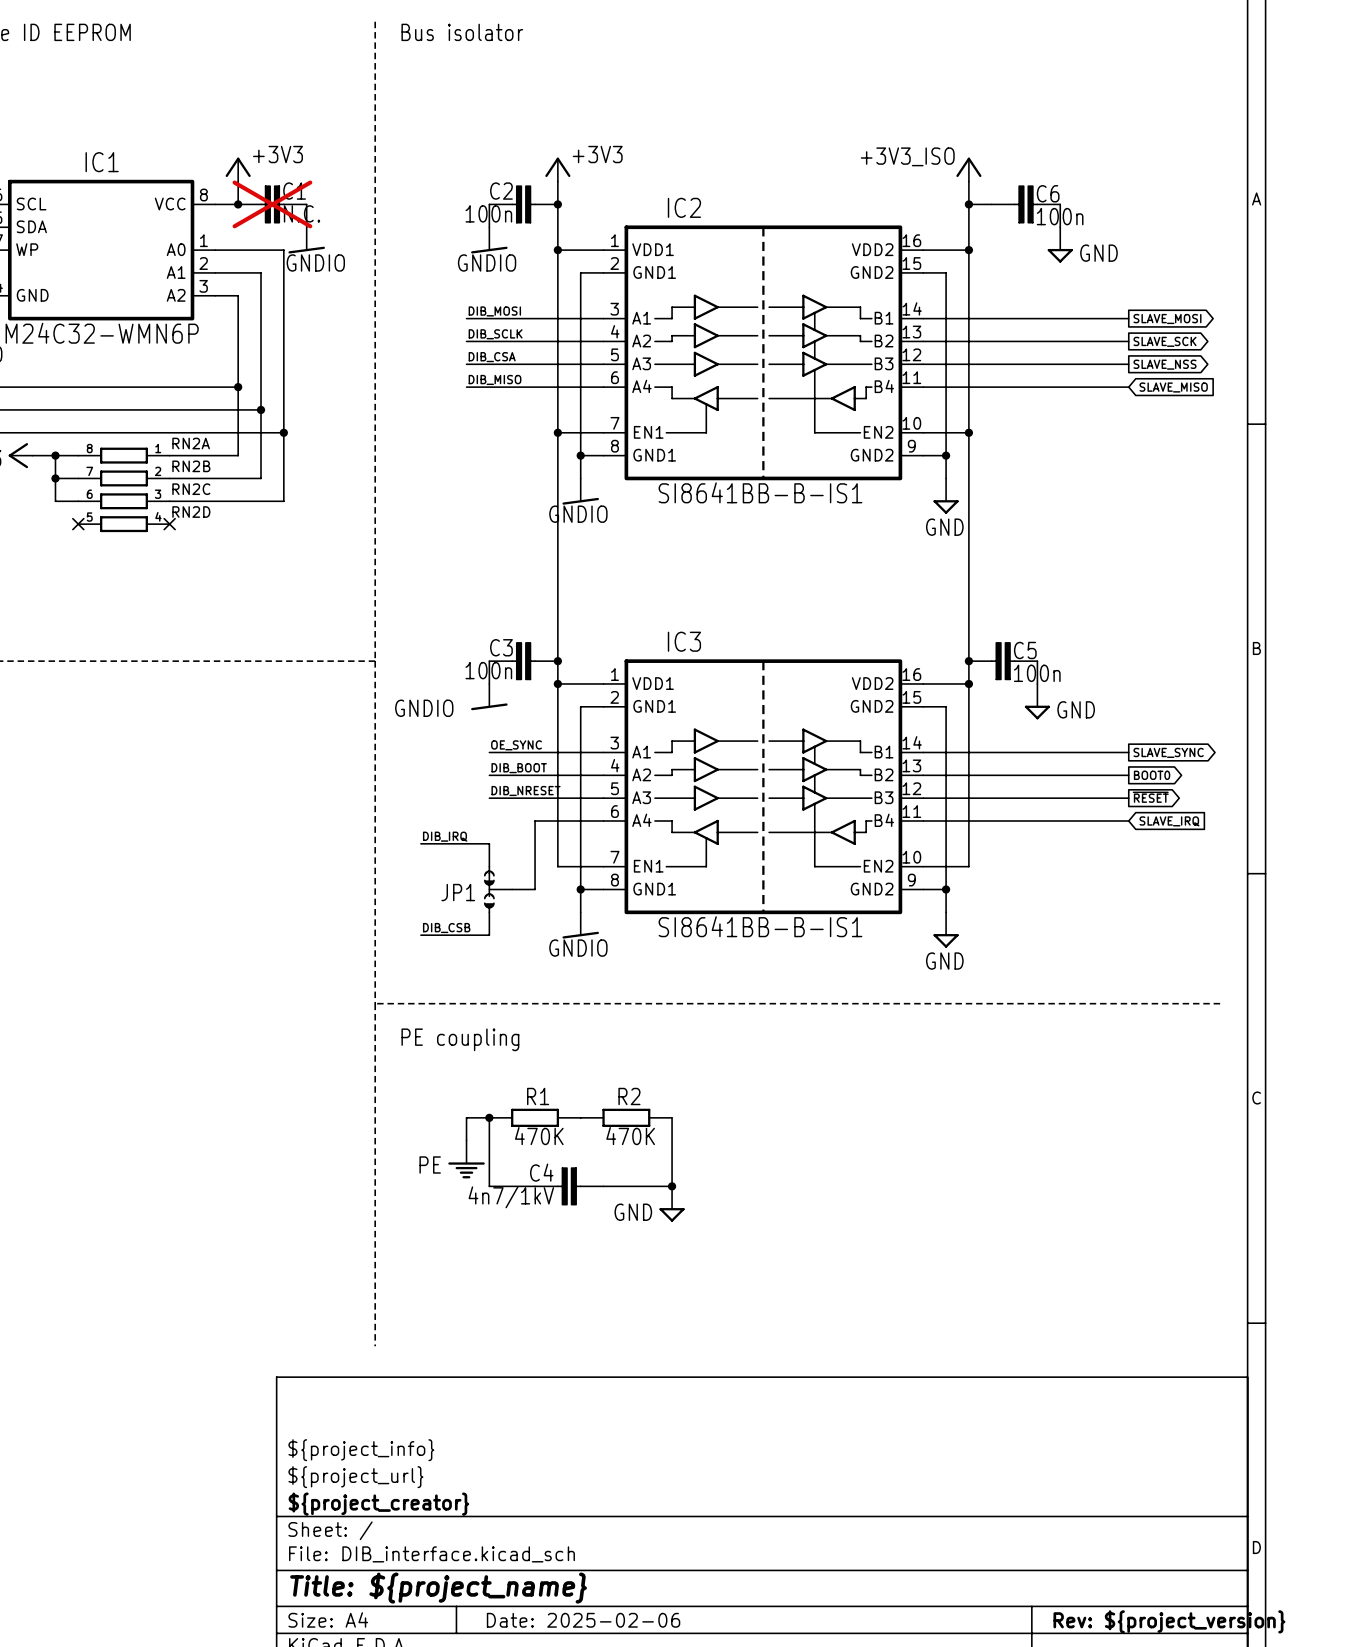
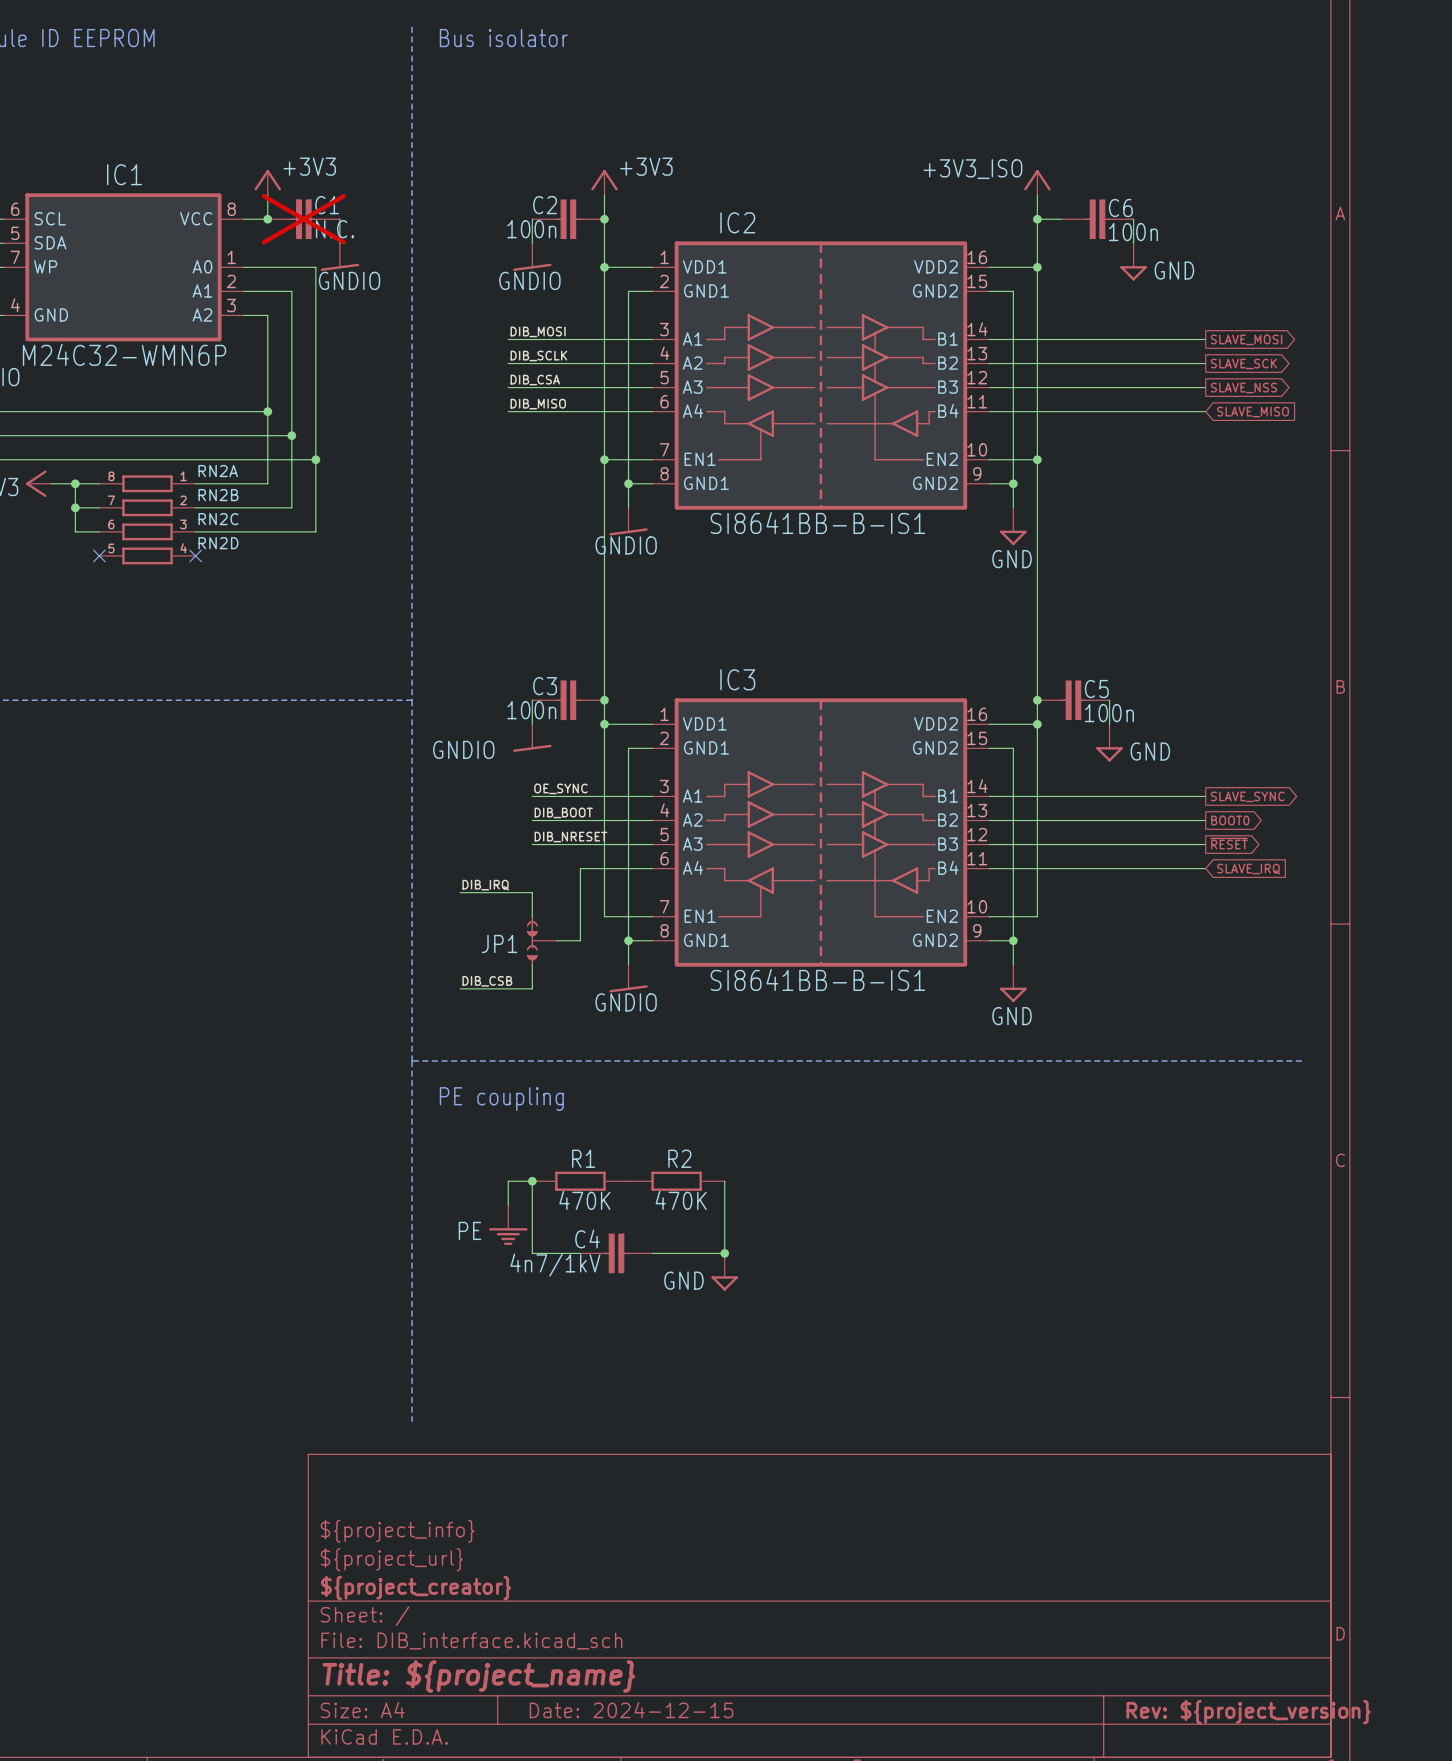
title block: Date: 2025-02-06 (583, 1620) -> Date: 2024-12-15 (631, 1710)

